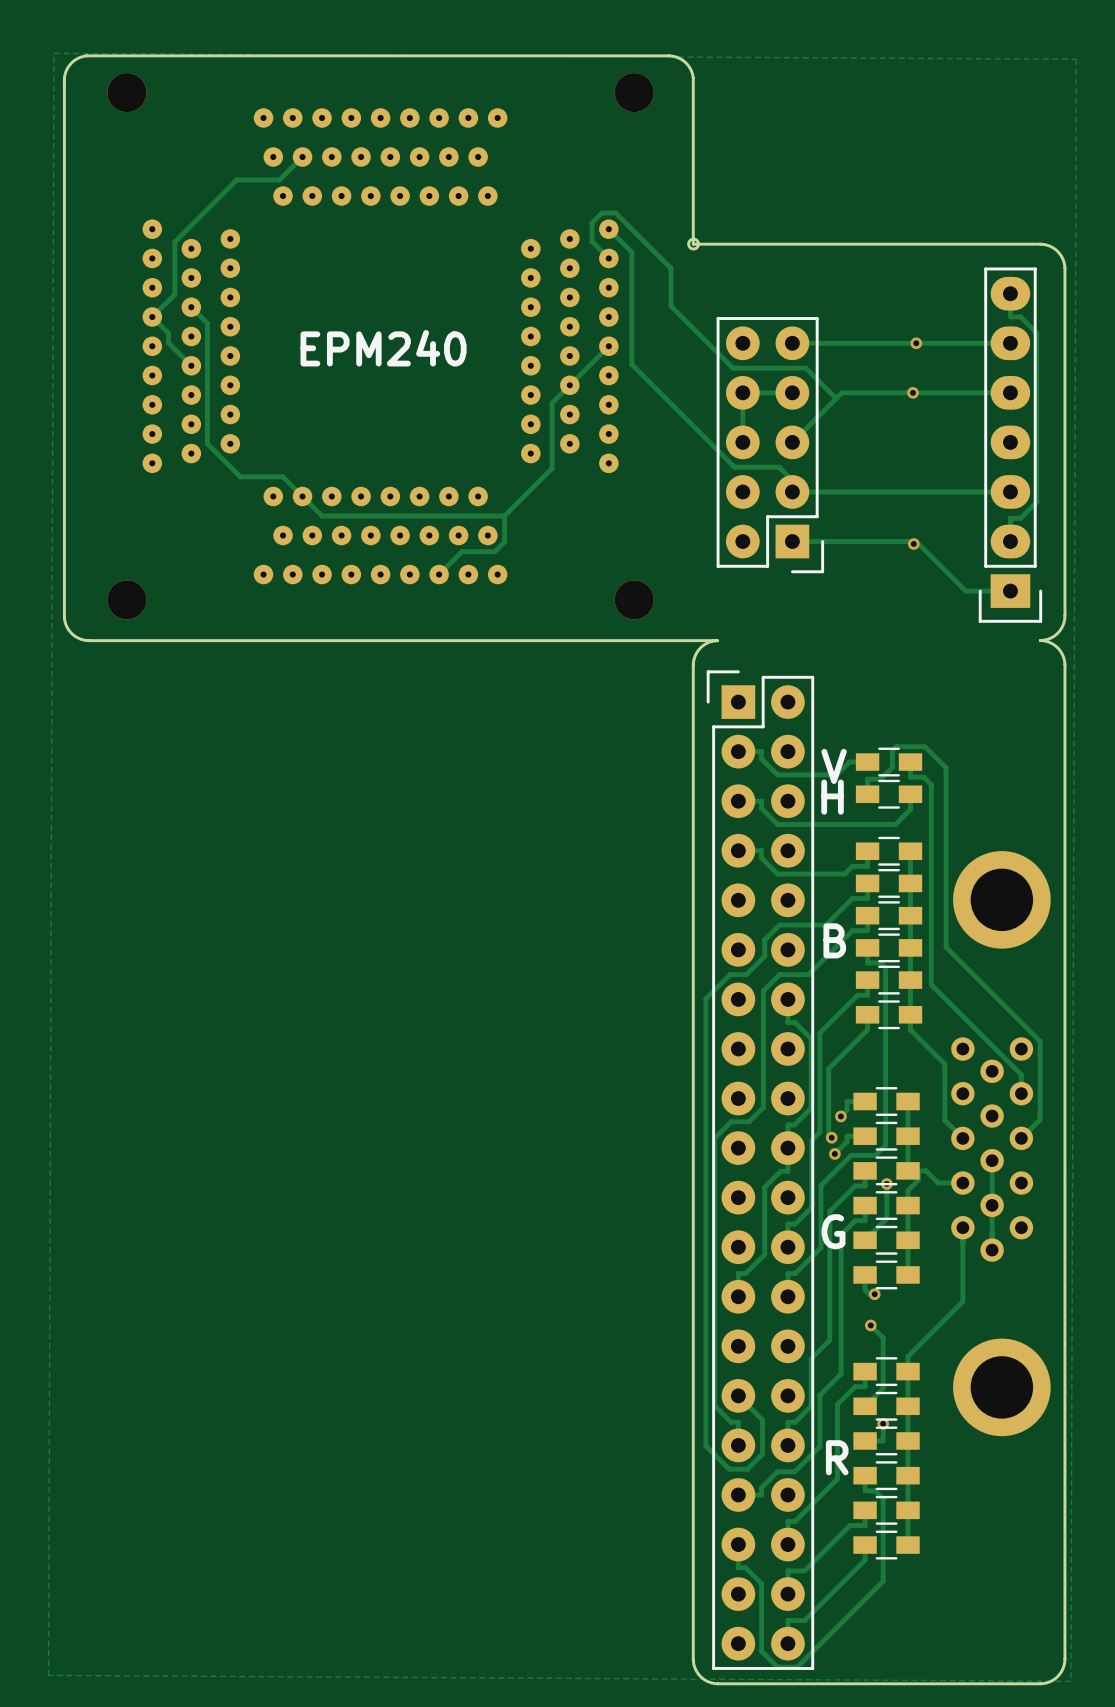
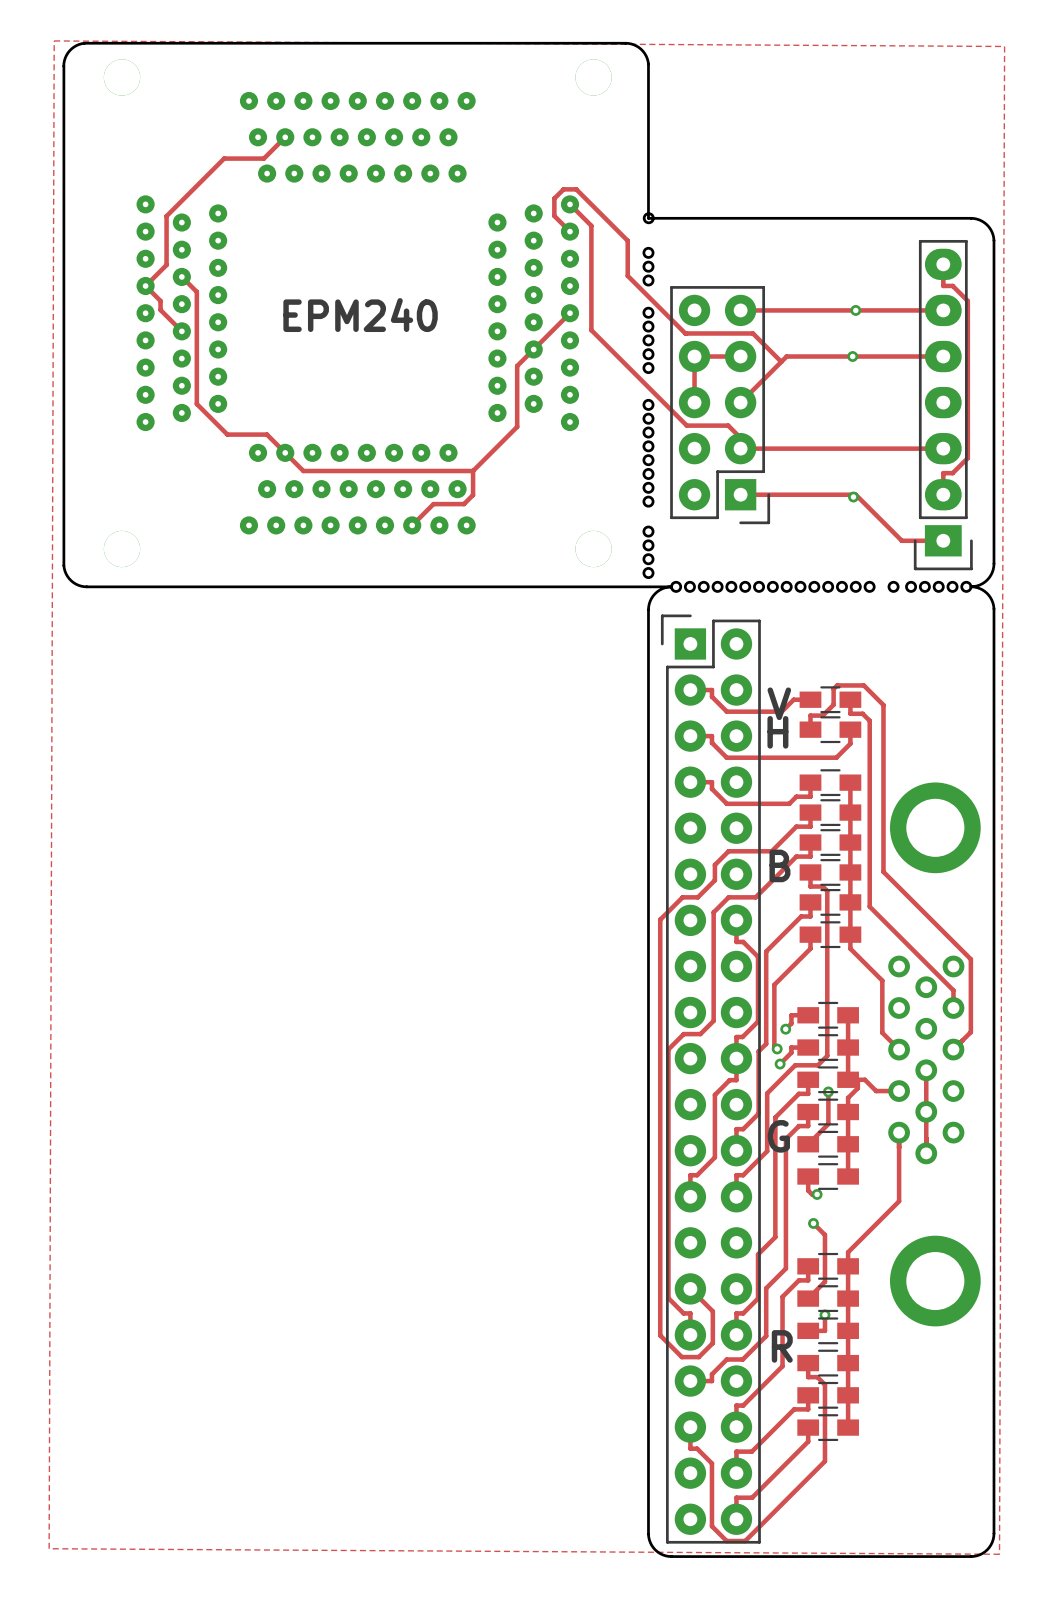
round board edge: none -> [642, 246, 655, 259]
round board edge: none -> [642, 260, 655, 273]
round board edge: none -> [642, 274, 655, 287]
round board edge: none -> [642, 306, 655, 319]
round board edge: none -> [642, 320, 655, 333]
round board edge: none -> [642, 334, 655, 347]
round board edge: none -> [642, 348, 655, 361]
round board edge: none -> [642, 362, 655, 374]
round board edge: none -> [642, 398, 655, 411]
round board edge: none -> [642, 412, 655, 425]
round board edge: none -> [642, 426, 655, 439]
round board edge: none -> [642, 440, 655, 453]
round board edge: none -> [642, 454, 655, 467]
round board edge: none -> [642, 468, 655, 480]
round board edge: none -> [642, 481, 655, 494]
round board edge: none -> [642, 495, 655, 508]
round board edge: none -> [642, 525, 655, 538]
round board edge: none -> [642, 539, 655, 552]
round board edge: none -> [642, 553, 655, 566]
round board edge: none -> [642, 567, 655, 580]
round board edge: none -> [670, 580, 683, 593]
round board edge: none -> [683, 580, 696, 593]
round board edge: none -> [697, 580, 710, 593]
round board edge: none -> [711, 580, 724, 593]
round board edge: none -> [725, 580, 738, 593]
round board edge: none -> [739, 580, 752, 593]
round board edge: none -> [753, 580, 766, 593]
round board edge: none -> [766, 580, 779, 593]
round board edge: none -> [780, 580, 793, 593]
round board edge: none -> [794, 580, 807, 593]
round board edge: none -> [808, 580, 821, 593]
round board edge: none -> [822, 580, 835, 593]
round board edge: none -> [836, 580, 848, 593]
round board edge: none -> [849, 580, 862, 593]
round board edge: none -> [863, 580, 876, 593]
round board edge: none -> [887, 580, 900, 593]
round board edge: none -> [905, 580, 918, 593]
round board edge: none -> [918, 580, 931, 593]
round board edge: none -> [932, 580, 945, 593]
round board edge: none -> [946, 580, 959, 593]
round board edge: none -> [960, 580, 973, 593]

